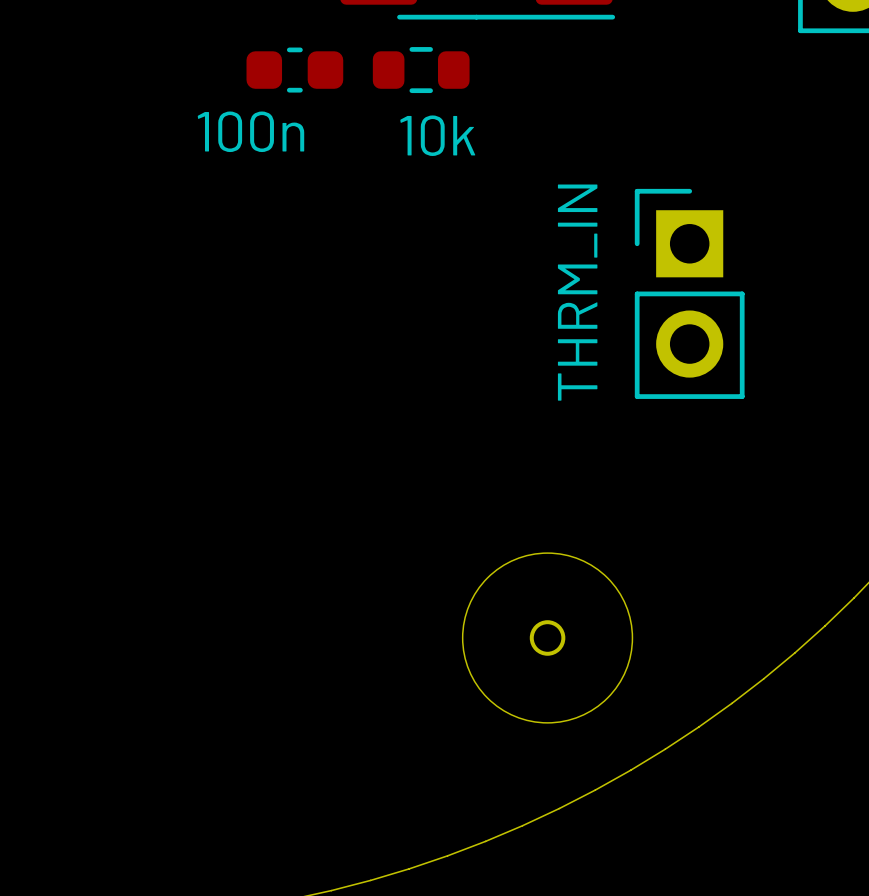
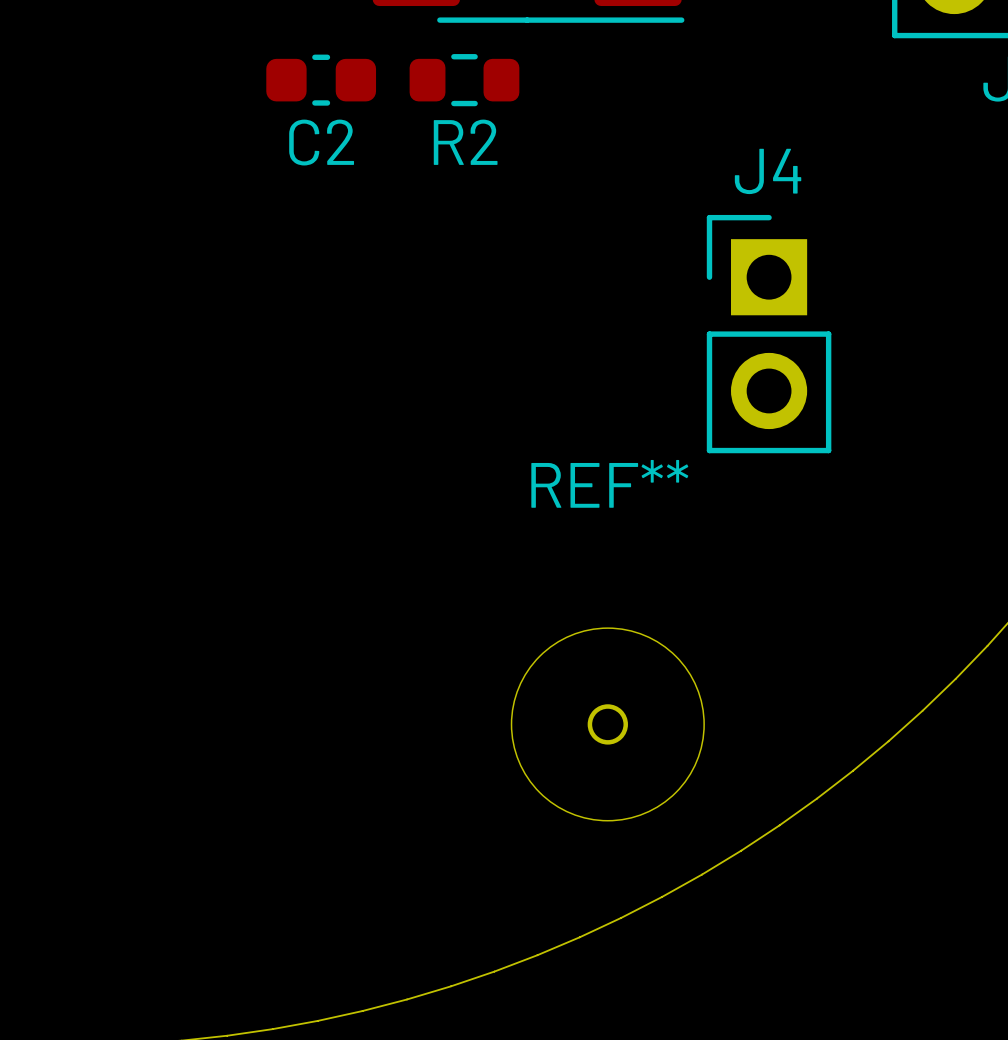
R2 name: none -> R2 (465, 142)
C2 name: none -> C2 (321, 142)
C2 value: 100n (250, 131) -> none
R2 value: 10k (437, 135) -> none
J4 name: none -> J4 (768, 171)
J4 value: THRM_IN (577, 292) -> none
REF** name: none -> REF** (609, 483)

